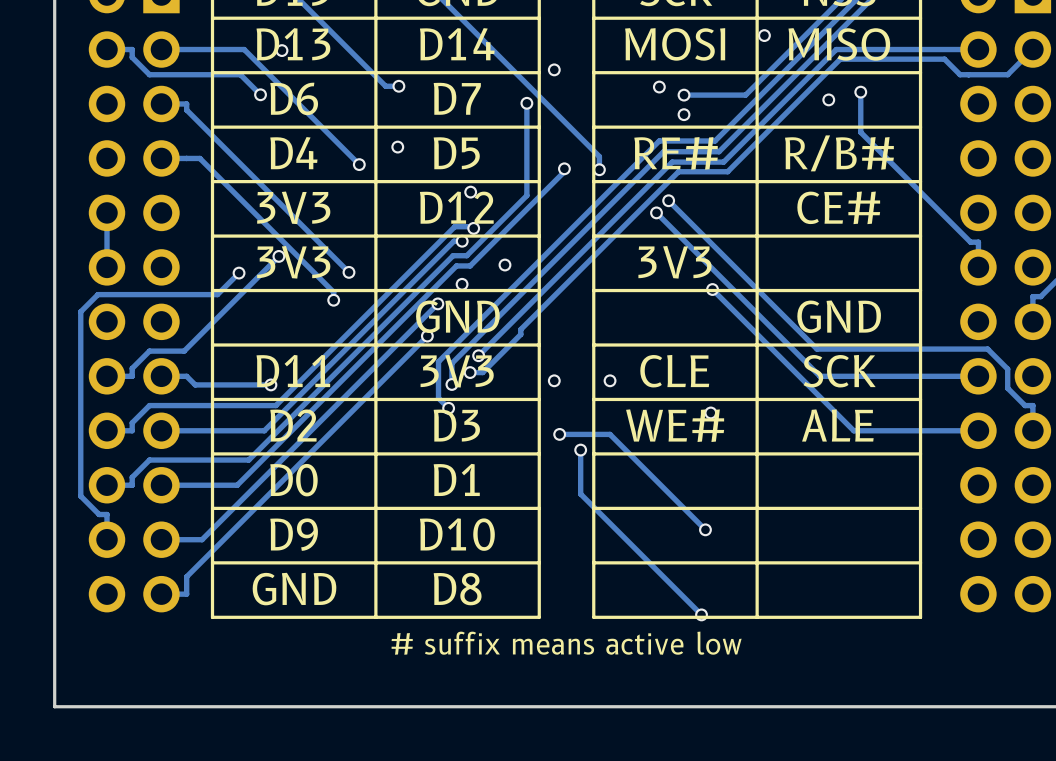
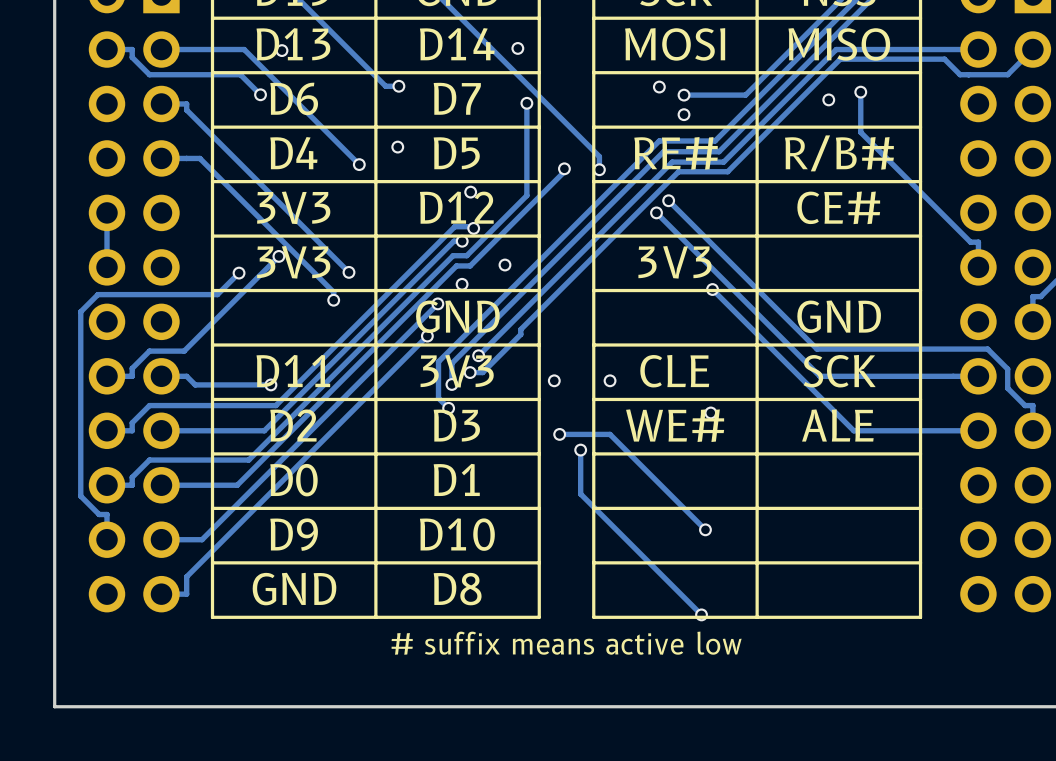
via: (764, 35) -> none
via position: (554, 69) -> (517, 48)

